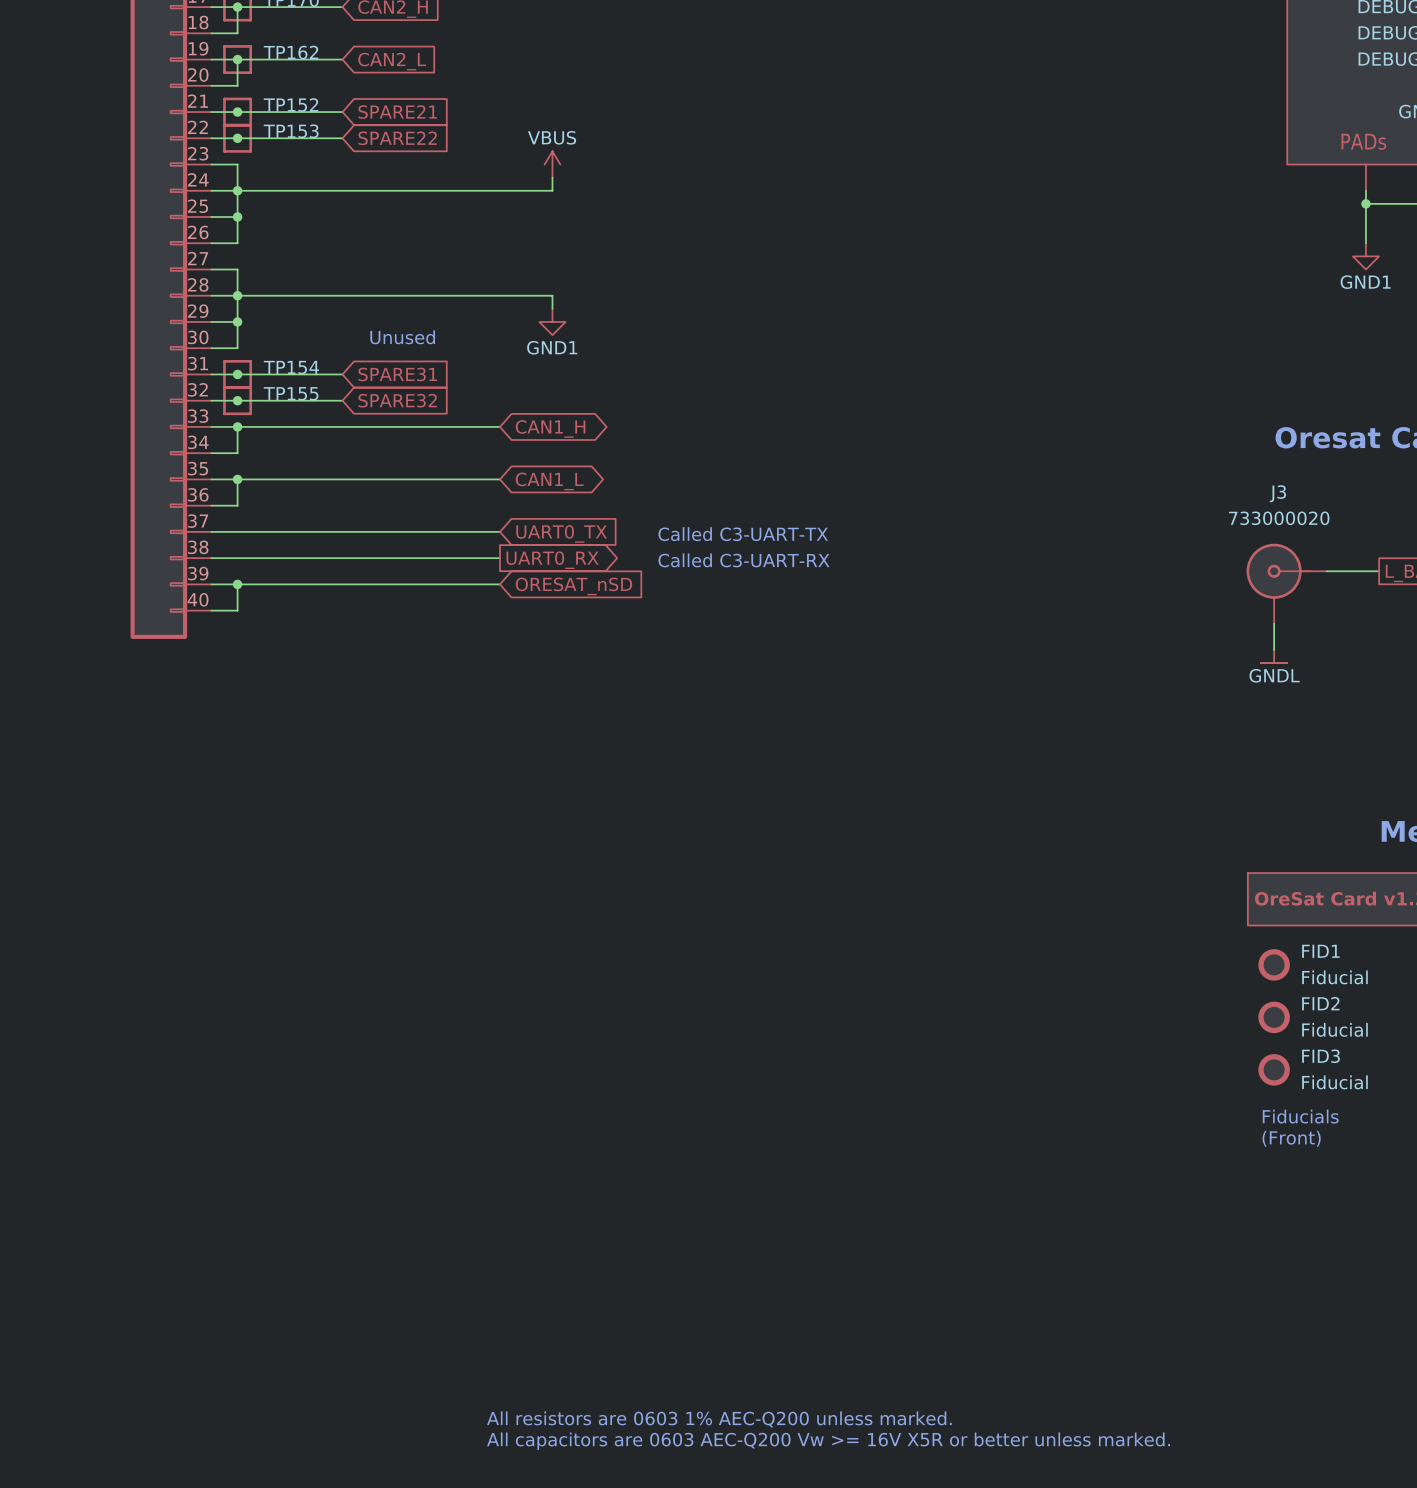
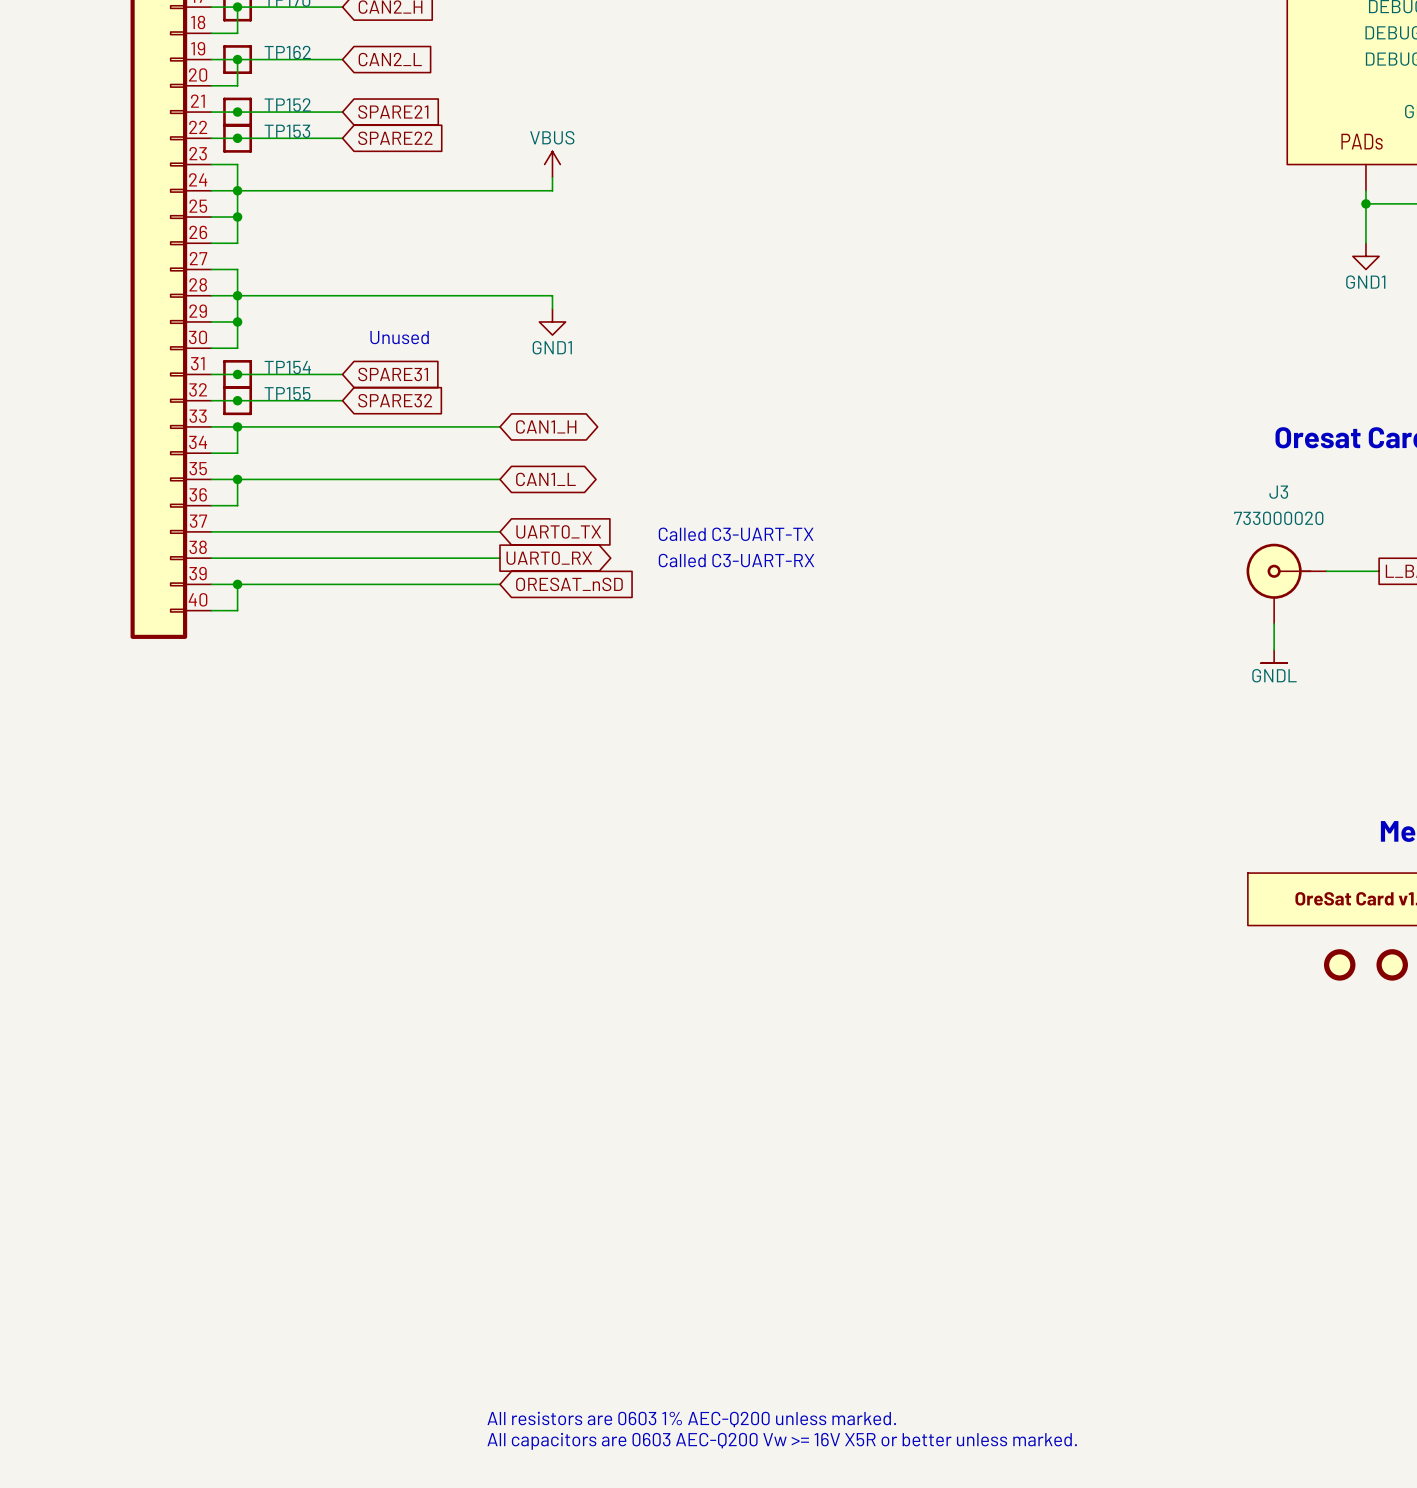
FID1: Fiducial (1274, 964) -> none
part: none -> (1339, 964)
part: none -> (1392, 964)
FID2: Fiducial (1274, 1017) -> none
FID3: Fiducial (1274, 1069) -> none
text: Fiducials (1300, 1116) -> none
text: (Front) (1291, 1138) -> none

